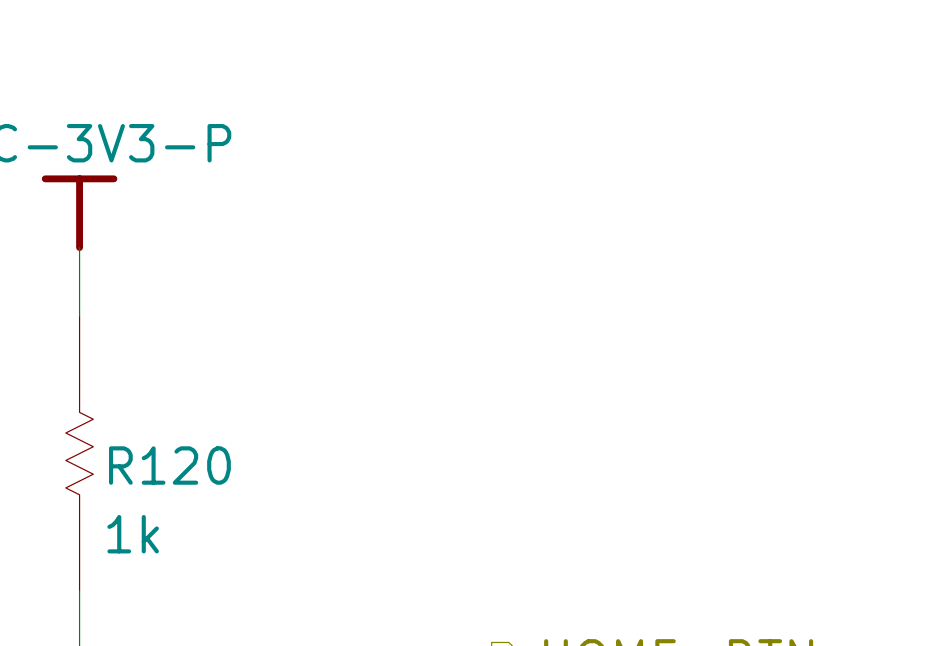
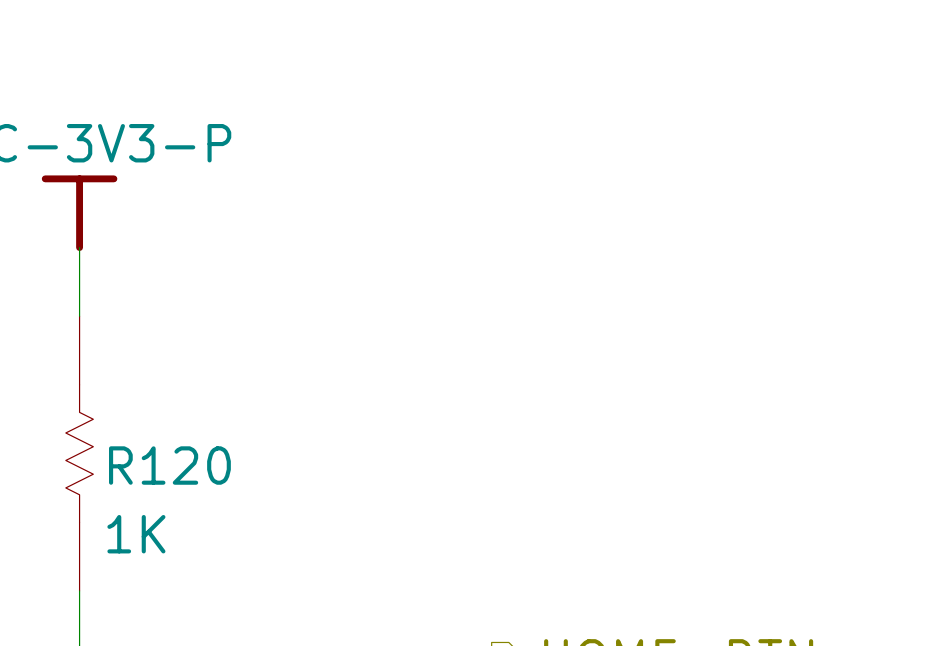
R120 value: 1k (133, 534) -> 1K (136, 534)

